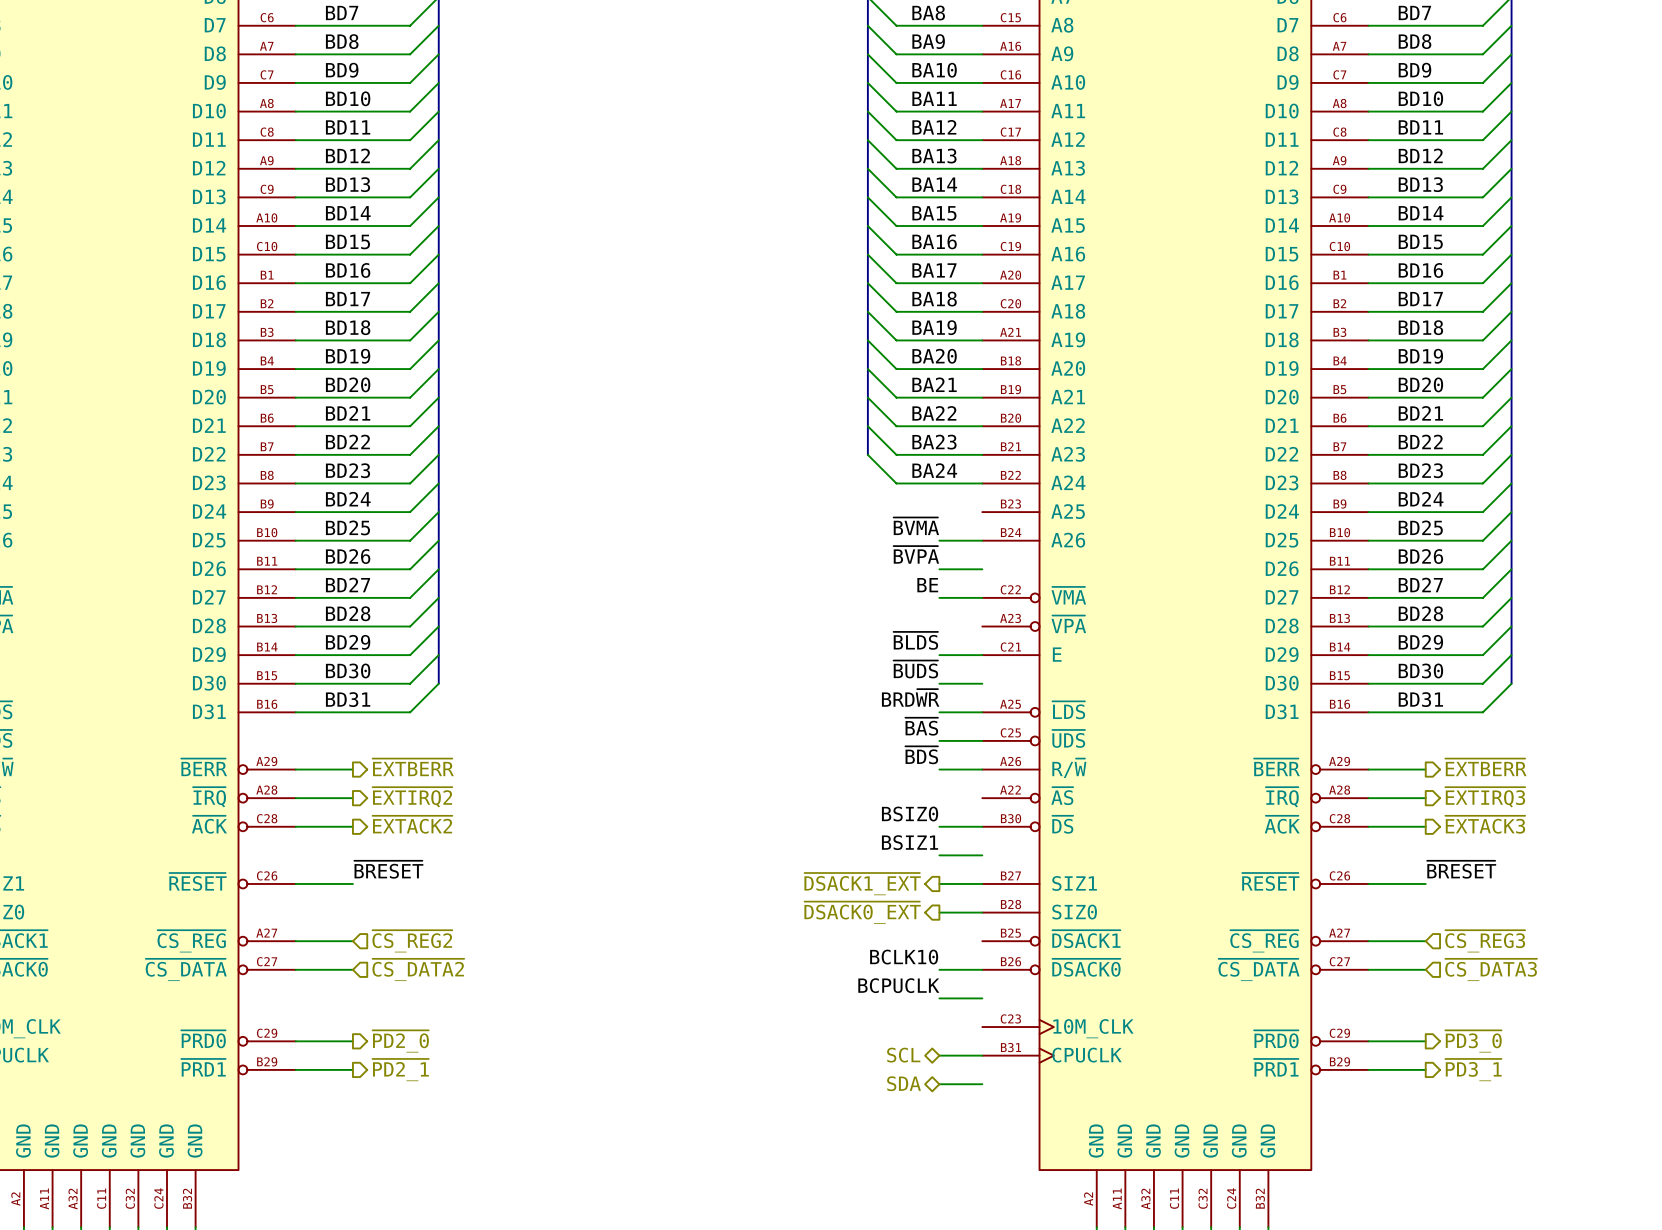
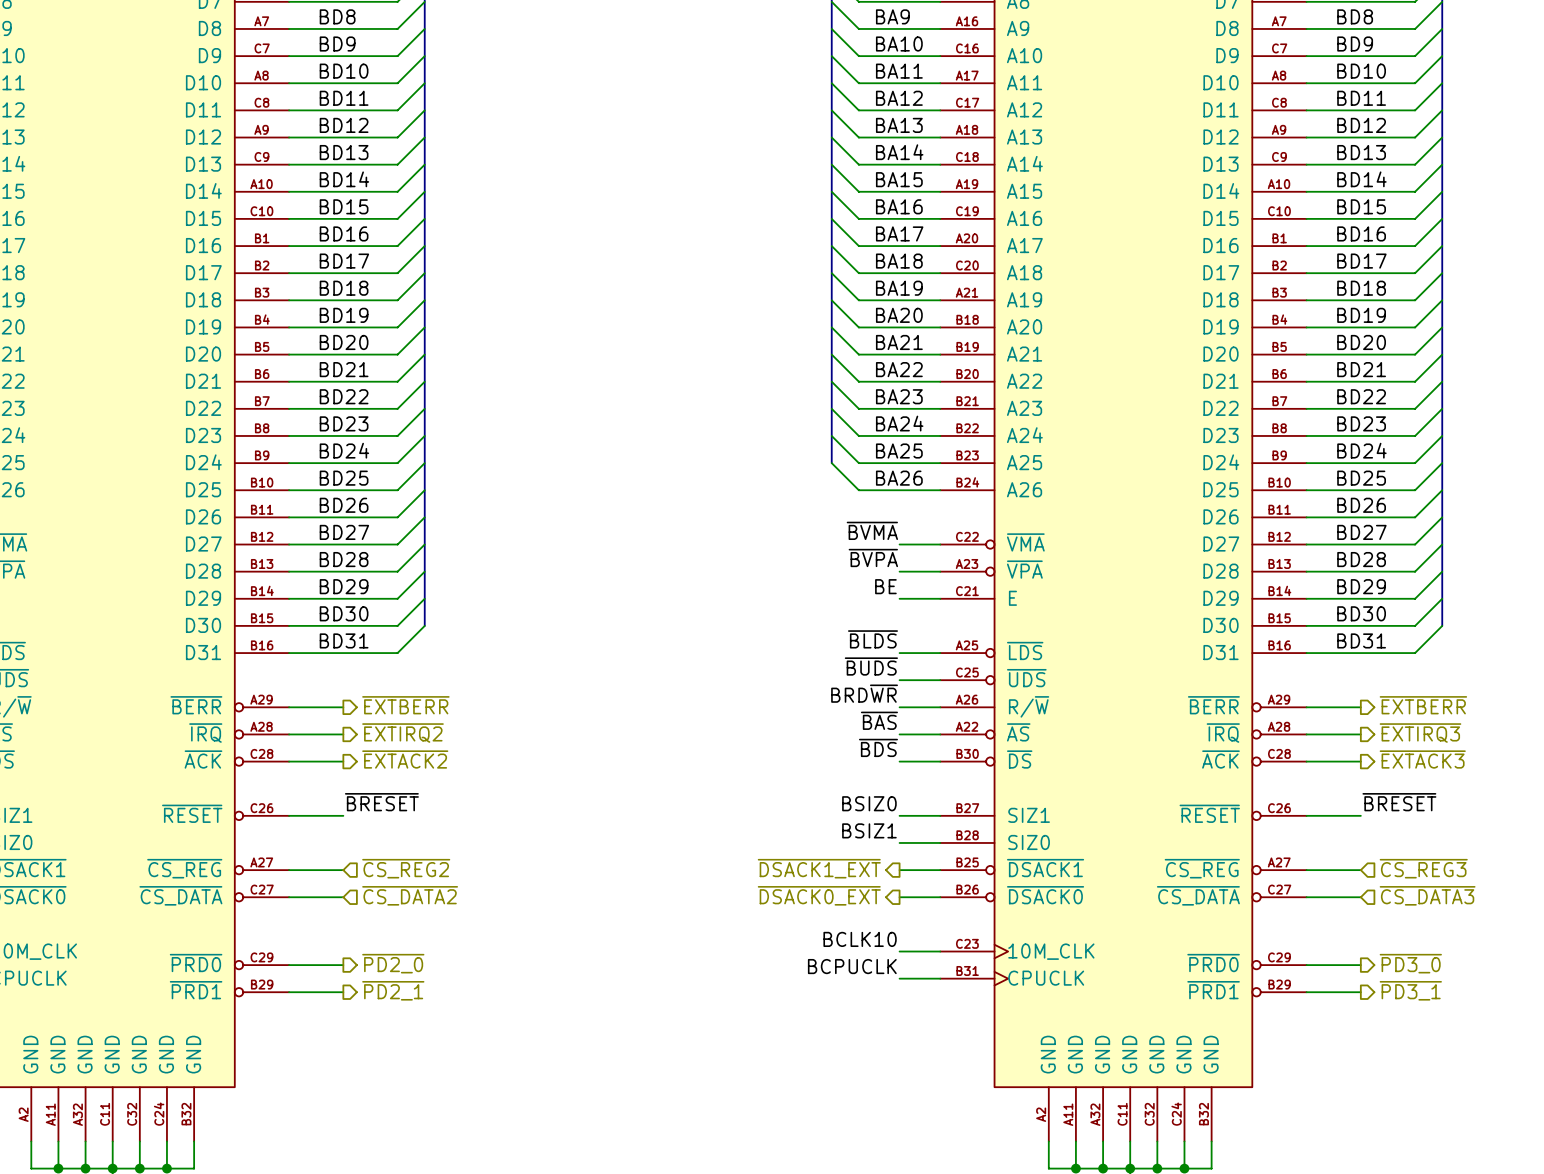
bus: none -> (831, 408) (831, 463)
wire: none -> (831, 435) (858, 463) (940, 463)
label: none -> BA25 (899, 451)
wire: none -> (831, 463) (858, 490) (899, 490)
label: ~{BVMA} (916, 526) -> none
label: none -> BA26 (899, 478)
label position: ~{BVPA} (916, 554) -> ~{BVPA} (873, 557)
wire: (939, 569) (982, 569) -> none
label: BE (927, 585) -> ~{BVMA} (872, 530)
label: ~{BLDS} (915, 640) -> BE (885, 586)
label: ~{BUDS} (915, 669) -> none
wire: (939, 683) (982, 683) -> (899, 571) (940, 571)
label: BRD~{WR} (910, 697) -> ~{BLDS} (872, 639)
label: ~{BAS} (921, 726) -> ~{BUDS} (871, 666)
label: ~{BDS} (921, 755) -> BRD~{WR} (864, 693)
label: none -> ~{BAS} (879, 720)
label: BSIZ0 (910, 814) -> ~{BDS} (878, 747)
label position: BSIZ1 (910, 842) -> BSIZ1 (869, 830)
wire: (939, 855) (982, 855) -> (899, 734) (940, 734)
label: none -> BSIZ0 (869, 803)
hierarchical label position: ~{DSACK1_EXT} (862, 884) -> ~{DSACK1_EXT} (819, 868)
hierarchical label position: ~{DSACK0_EXT} (862, 912) -> ~{DSACK0_EXT} (819, 895)
label position: BCLK10 (904, 957) -> BCLK10 (860, 939)
label position: BCPUCLK (898, 985) -> BCPUCLK (852, 966)
wire: (939, 998) (982, 998) -> (899, 870) (940, 870)
hierarchical label: SCL (903, 1055) -> none
hierarchical label: SDA (904, 1083) -> none
wire: (939, 1084) (982, 1084) -> (899, 951) (940, 951)

